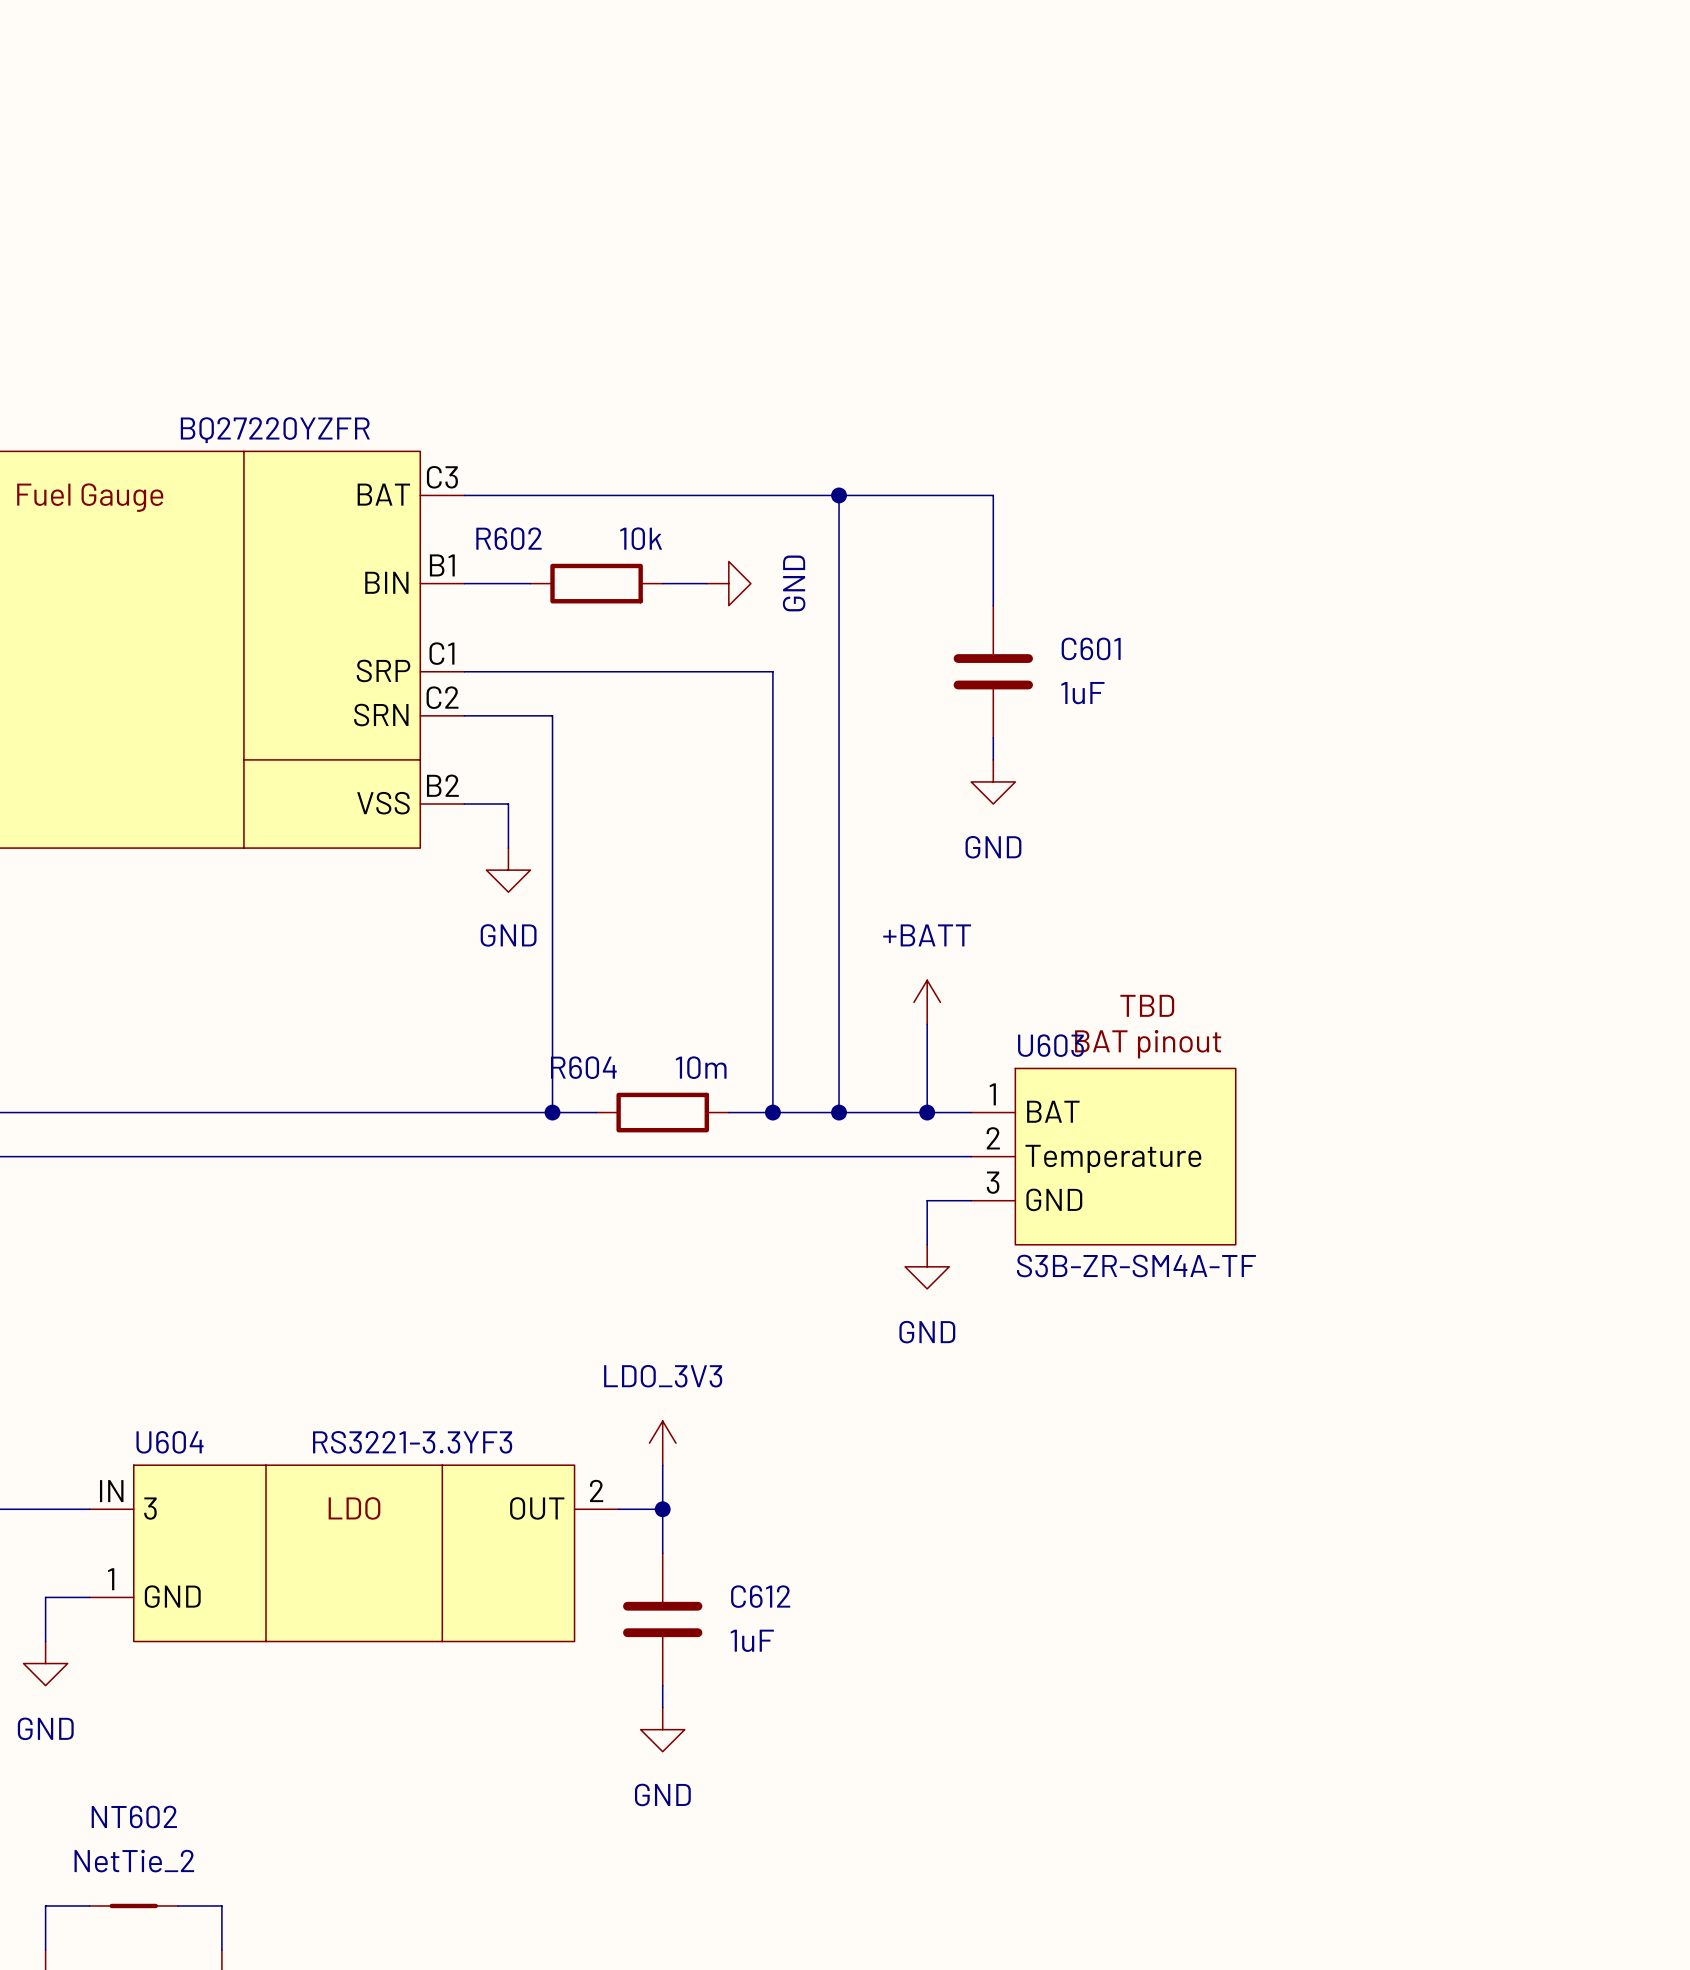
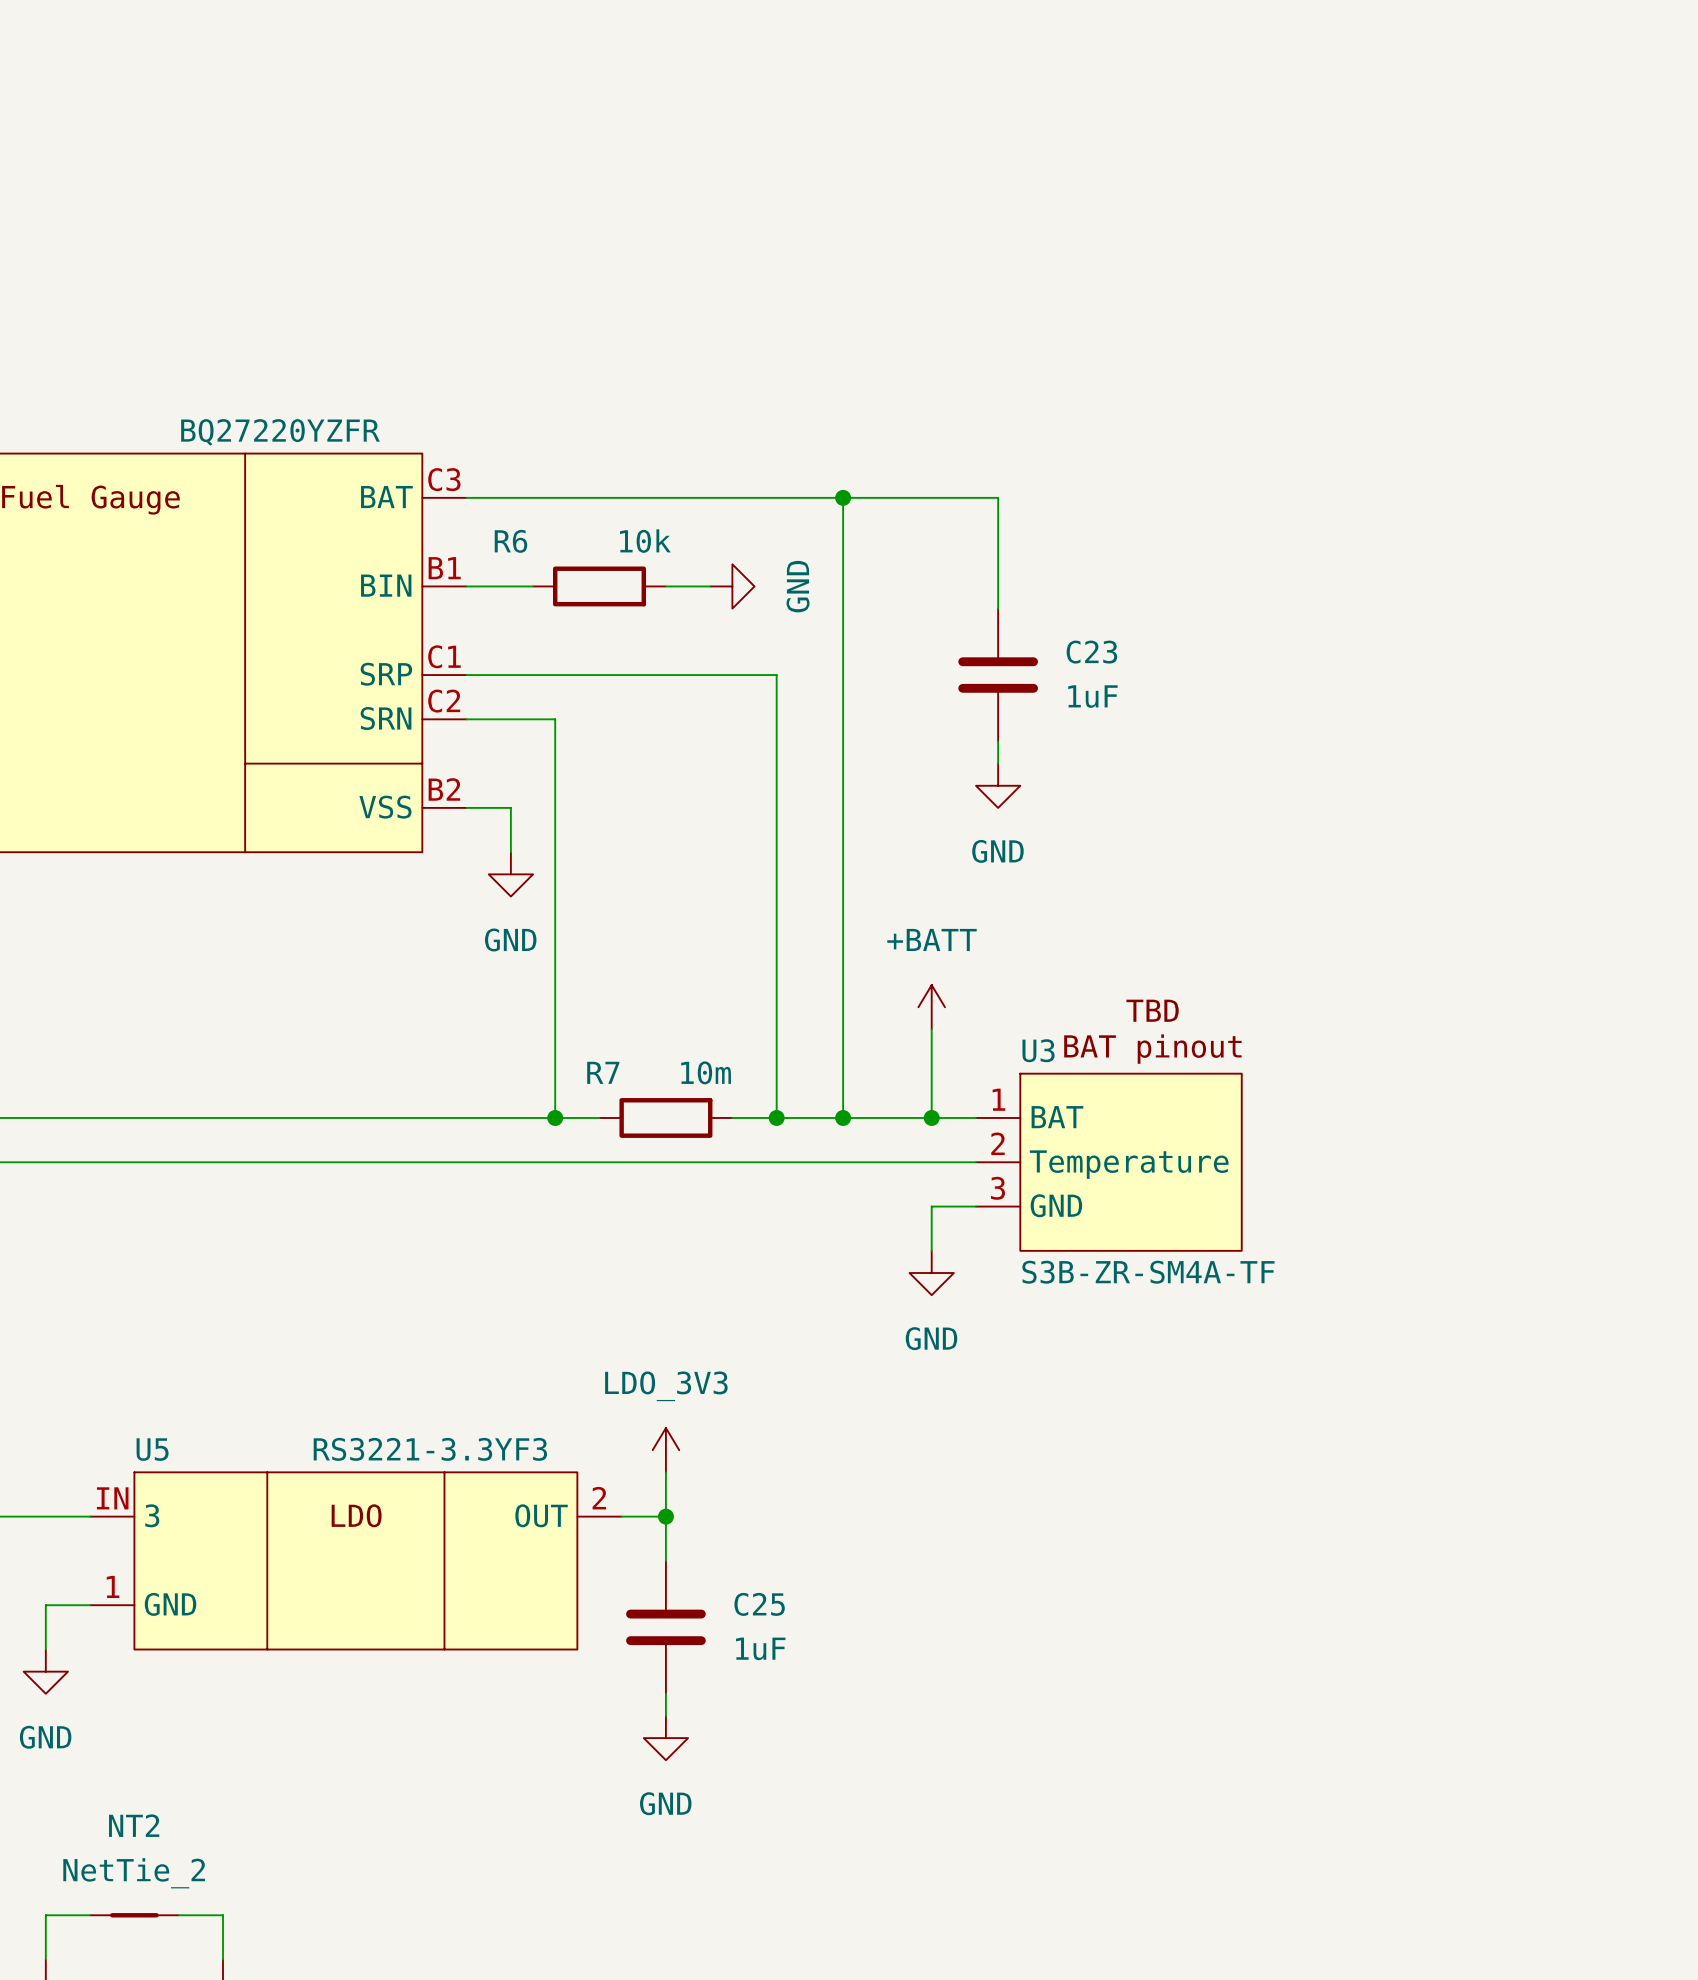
R602 name: R602 (509, 538) -> R6 (510, 541)
C601 name: C601 (1091, 648) -> C23 (1091, 652)
U603 name: U603 (1050, 1045) -> U3 (1038, 1050)
R604 name: R604 (583, 1067) -> R7 (603, 1072)
U604 name: U604 (170, 1442) -> U5 (152, 1449)
C612 name: C612 (760, 1596) -> C25 (759, 1604)
NT602 name: NT602 (134, 1817) -> NT2 (134, 1825)

